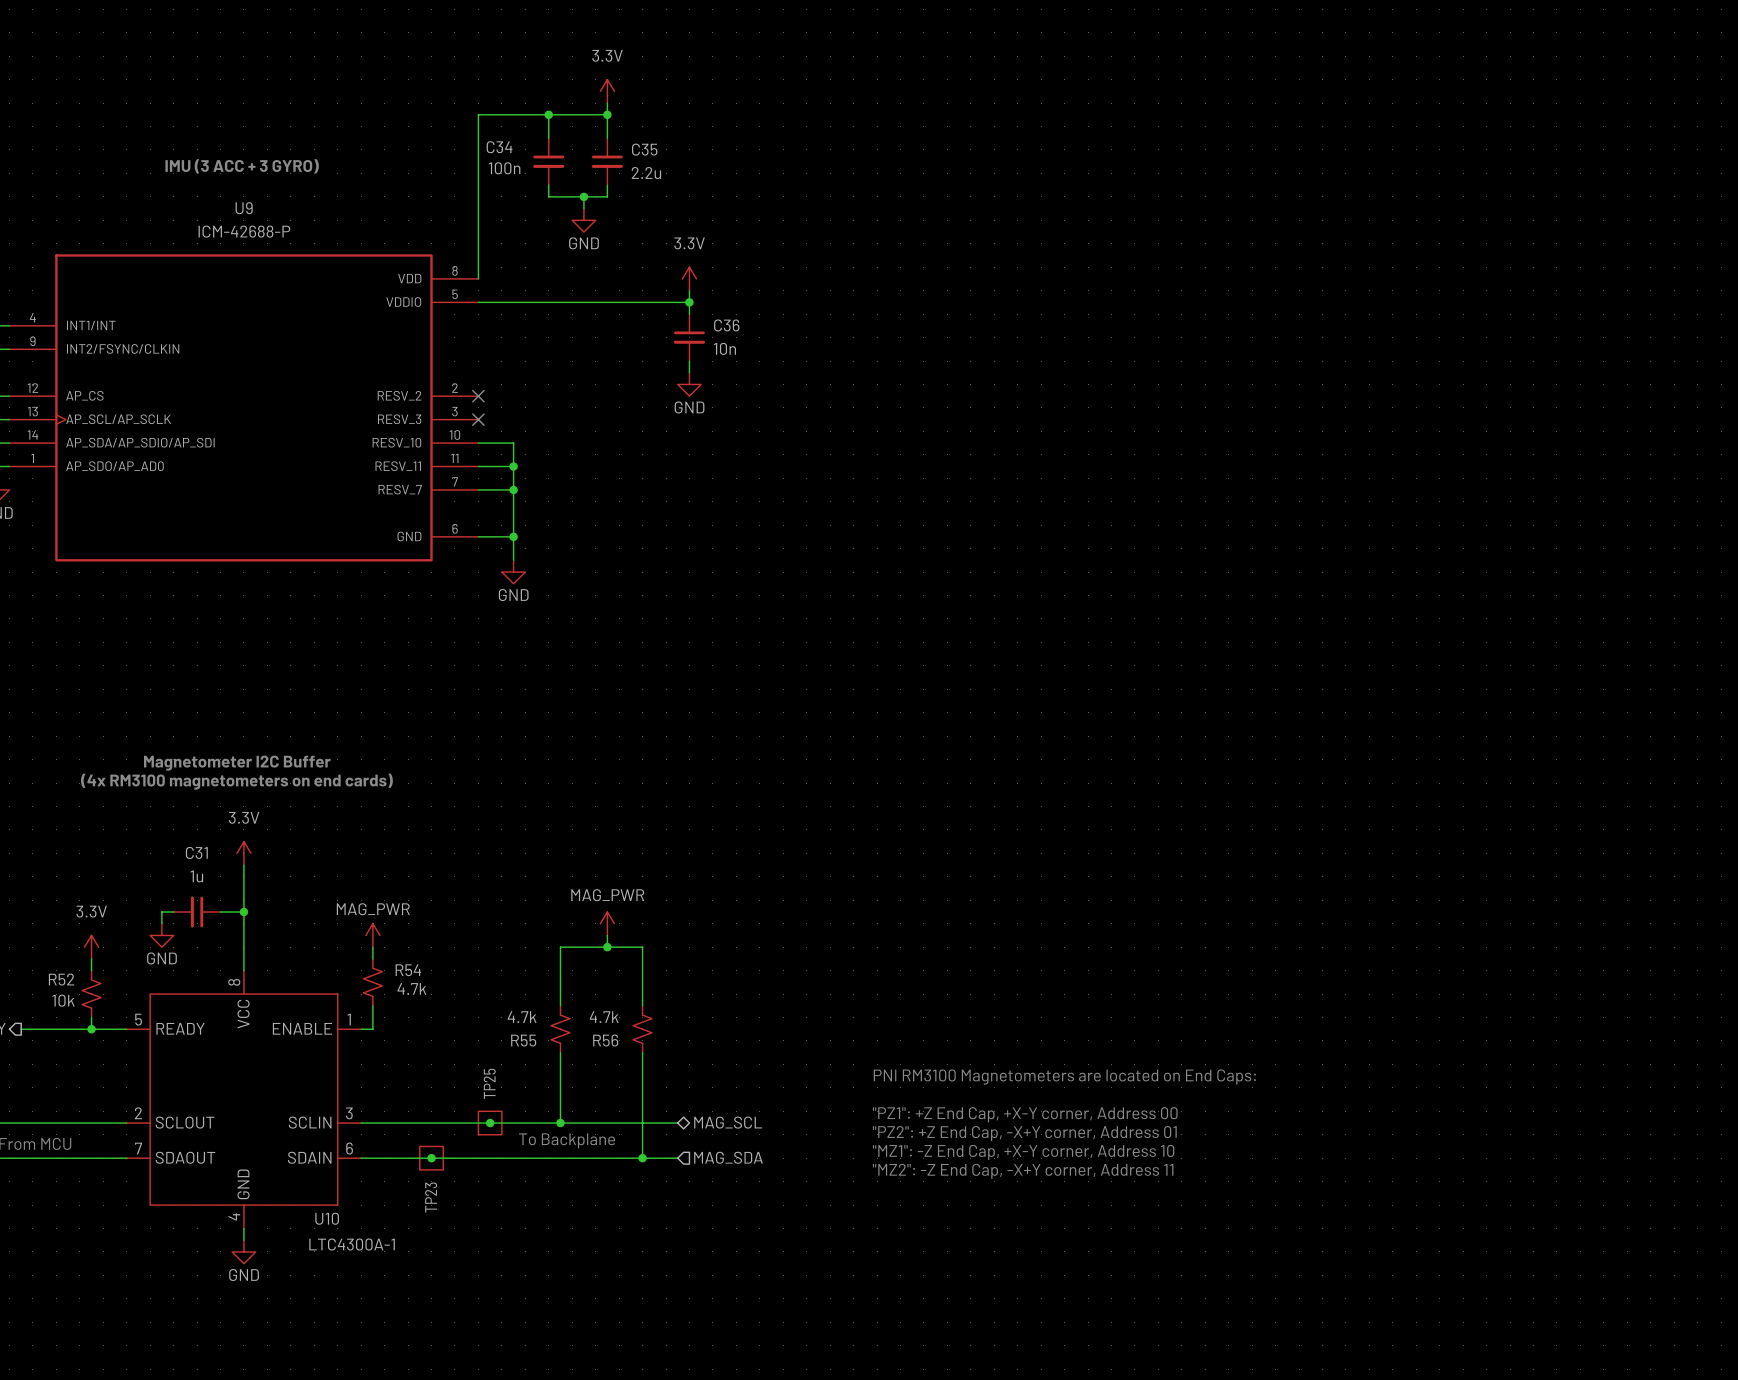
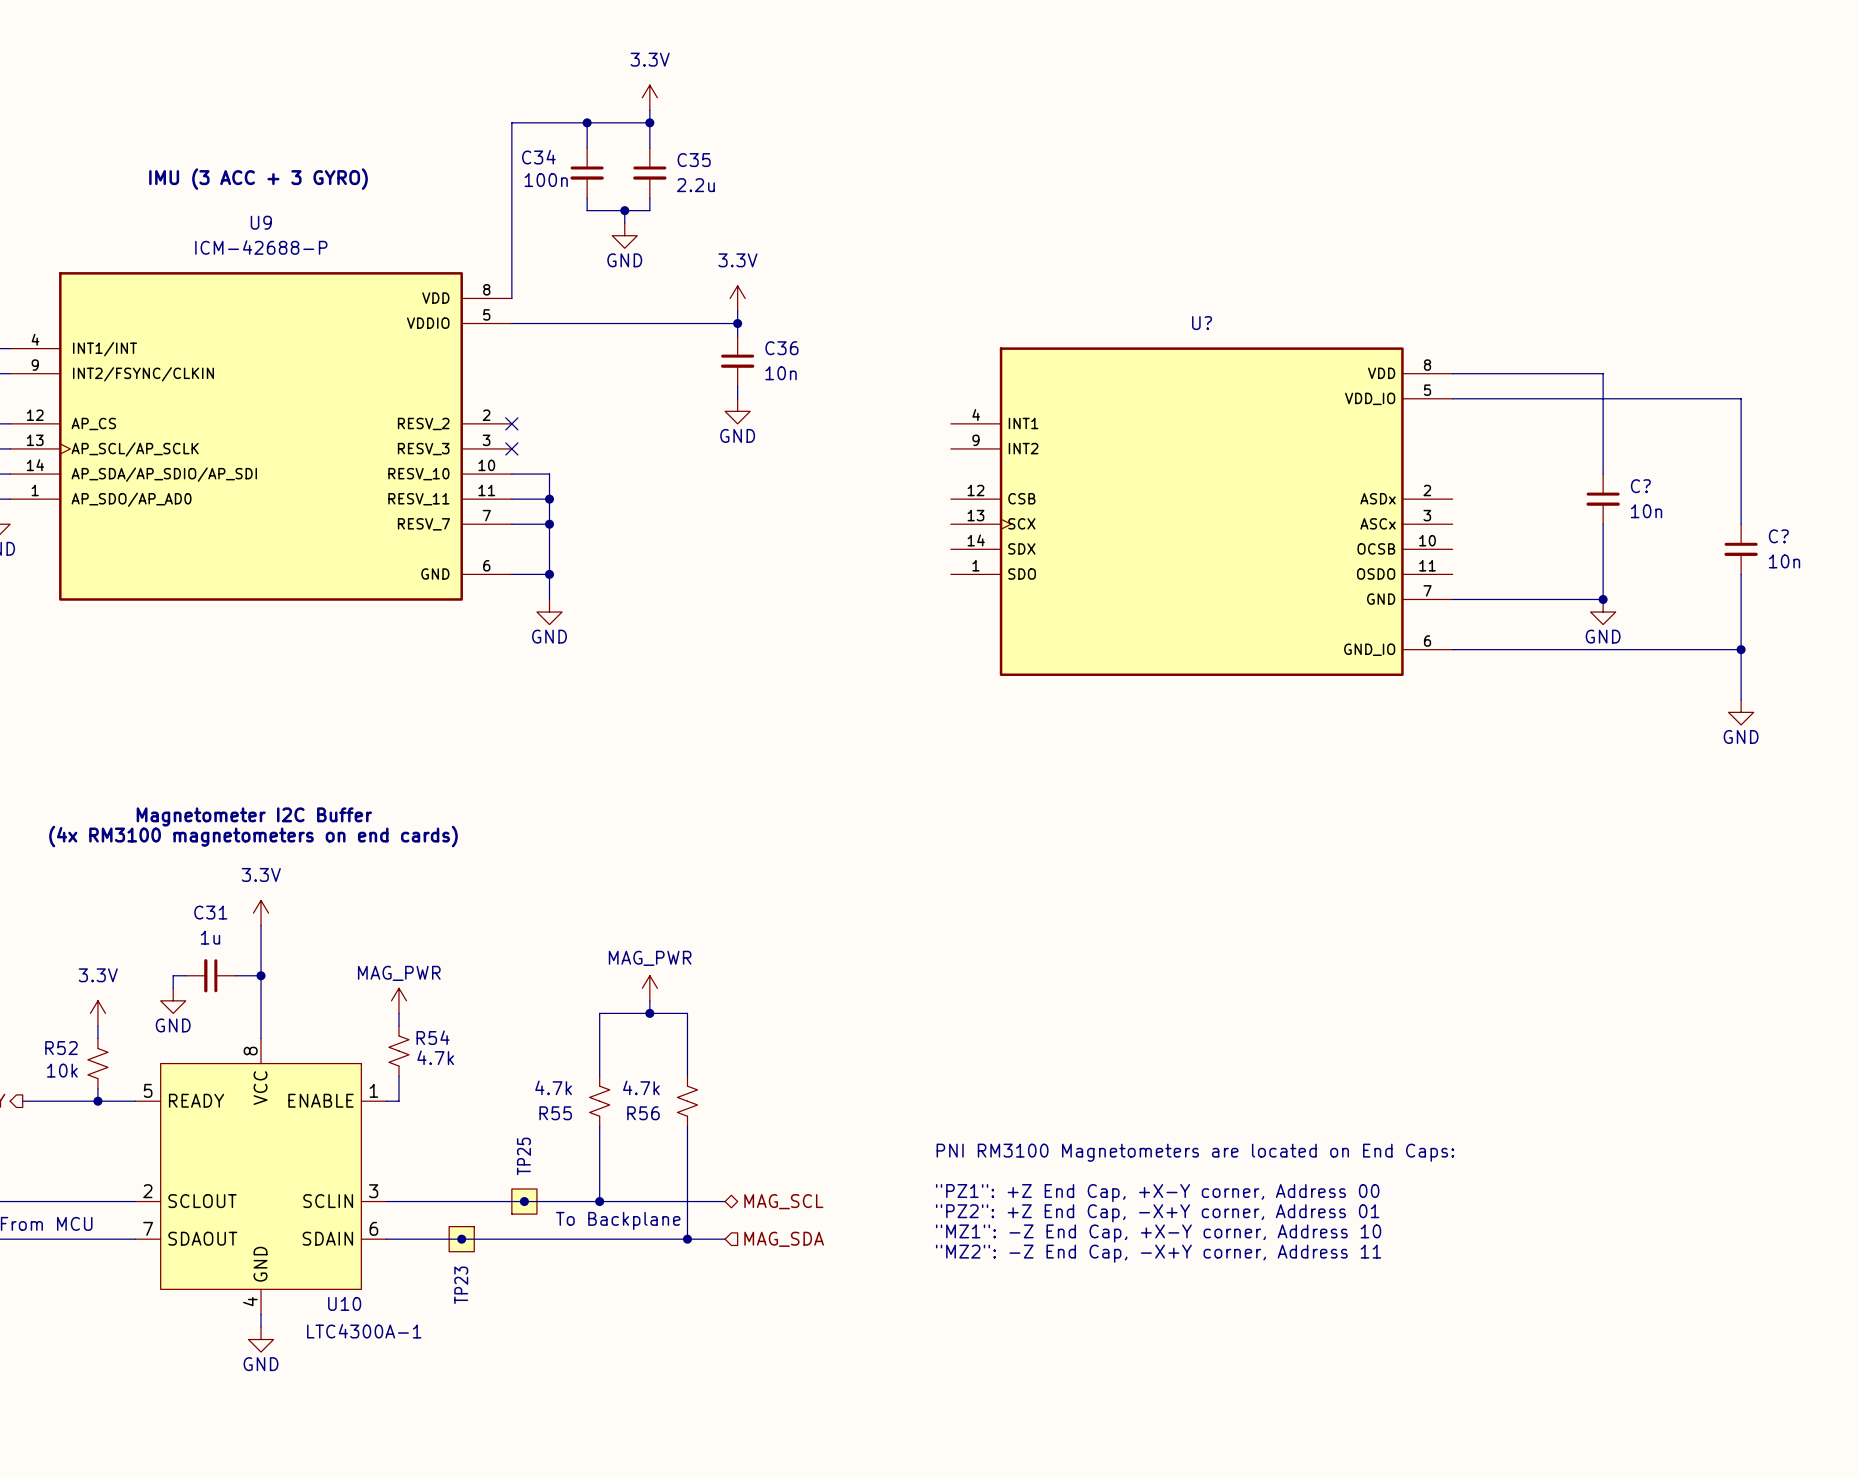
wire: none -> (1452, 373) (1603, 373) (1603, 474)
wire: none -> (1452, 398) (1741, 398) (1741, 524)
C?: none -> 10n (1603, 499)
U?: none -> (1201, 511)
wire: none -> (1603, 524) (1603, 599) (1452, 599)
C?: none -> 10n (1741, 549)
wire: none -> (1741, 574) (1741, 699)
junction: none -> (1603, 599)
power symbol: none -> GND (1603, 612)
wire: none -> (1452, 649) (1741, 649)
junction: none -> (1741, 649)
power symbol: none -> GND (1741, 712)

